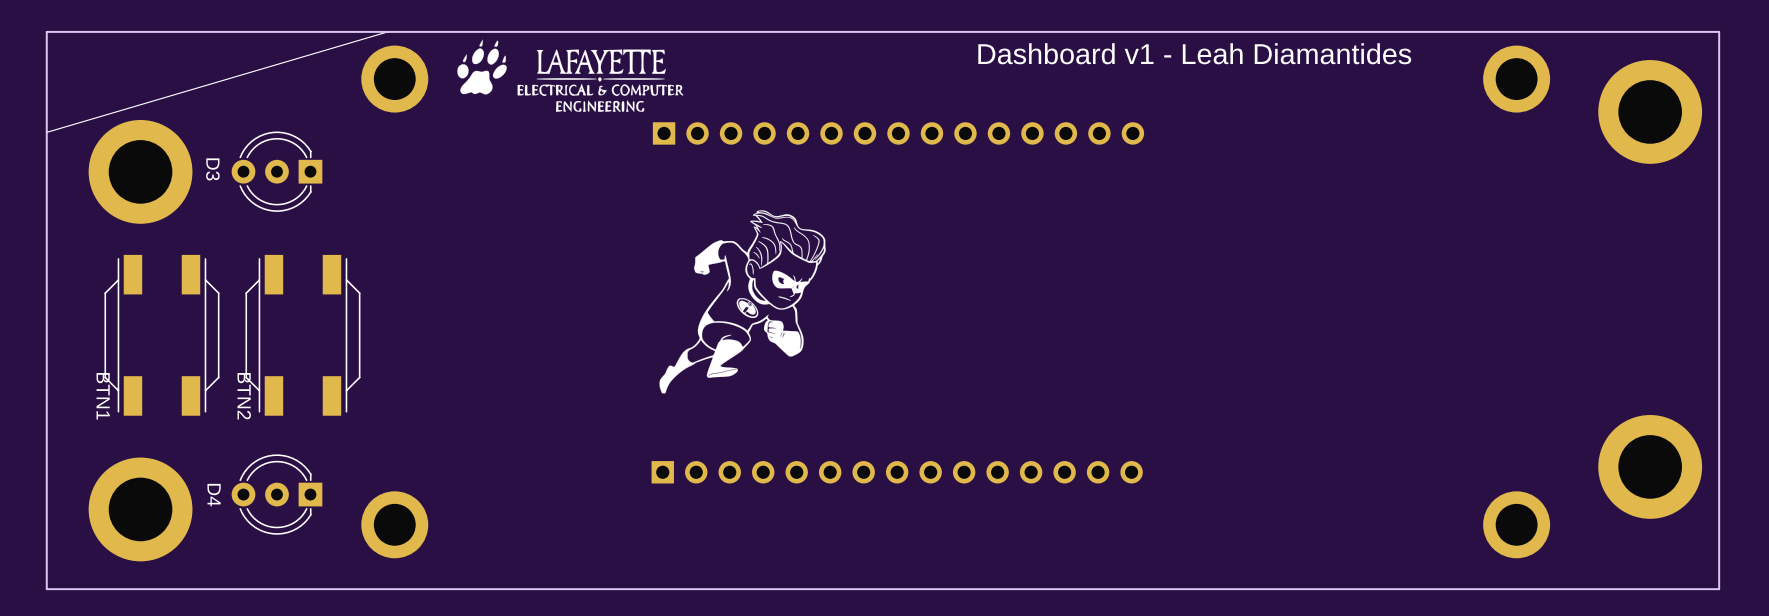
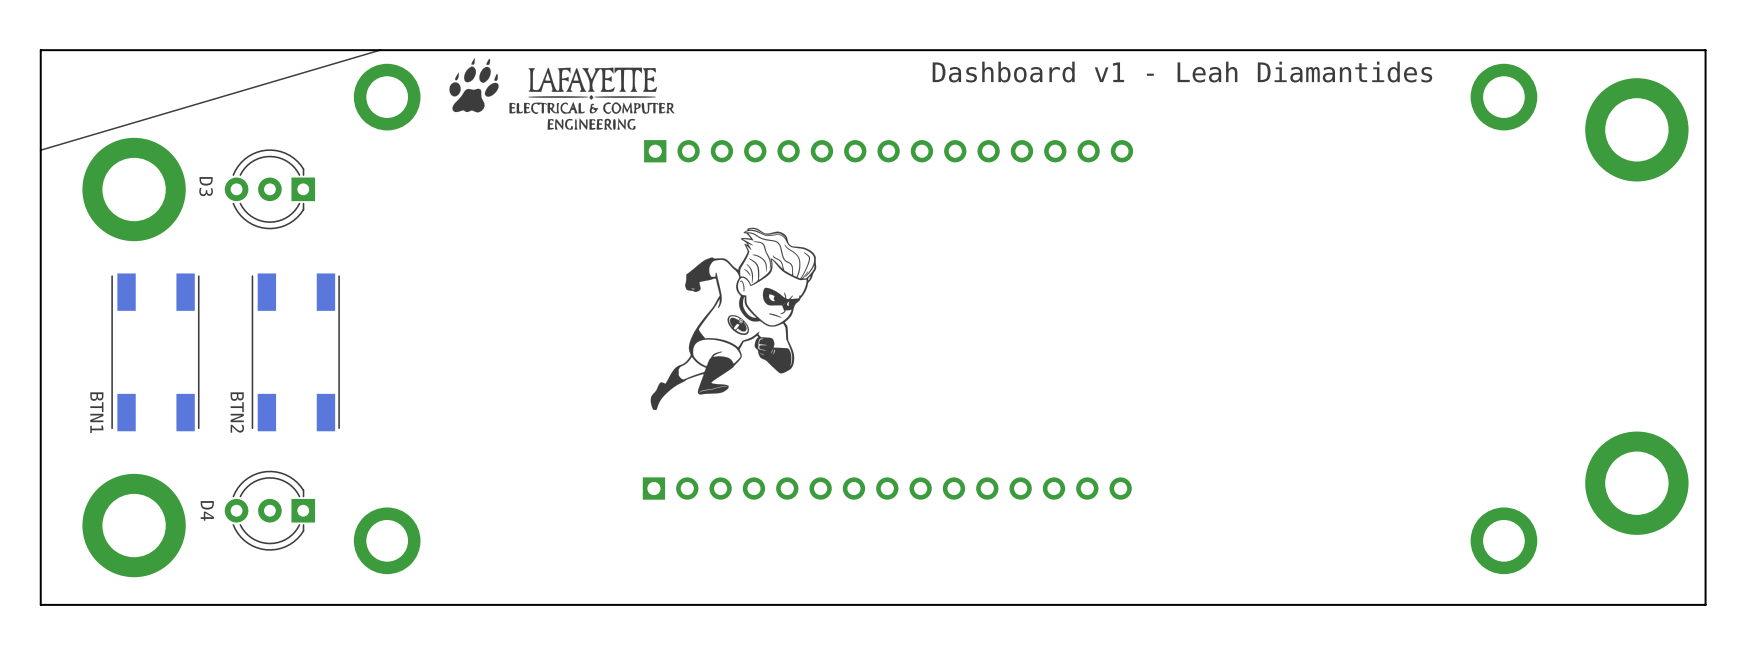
BTN1 footprint: [104, 254, 220, 416] -> [111, 273, 200, 432]
BTN2 footprint: [245, 254, 361, 416] -> [251, 273, 340, 432]

